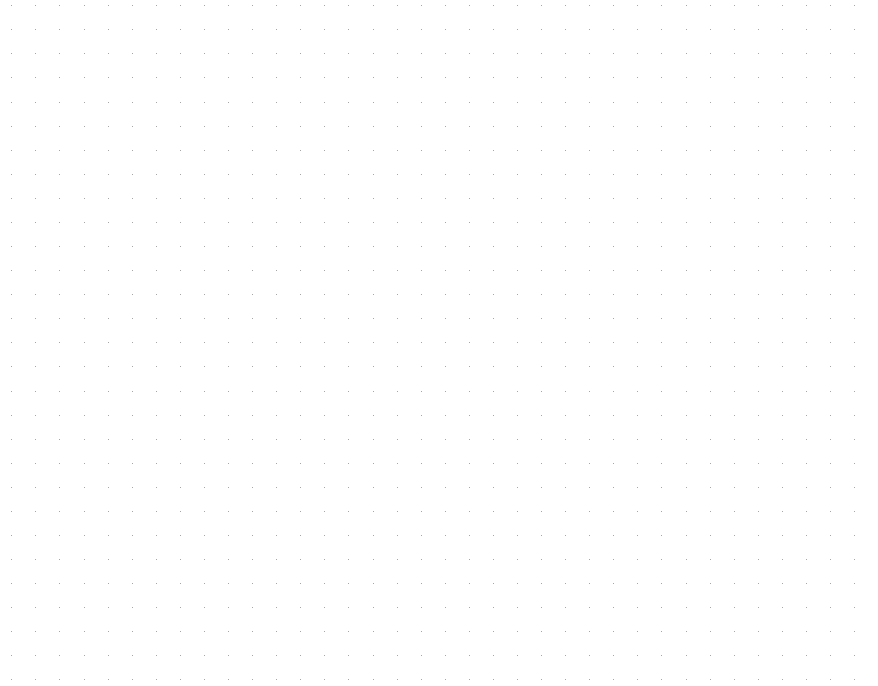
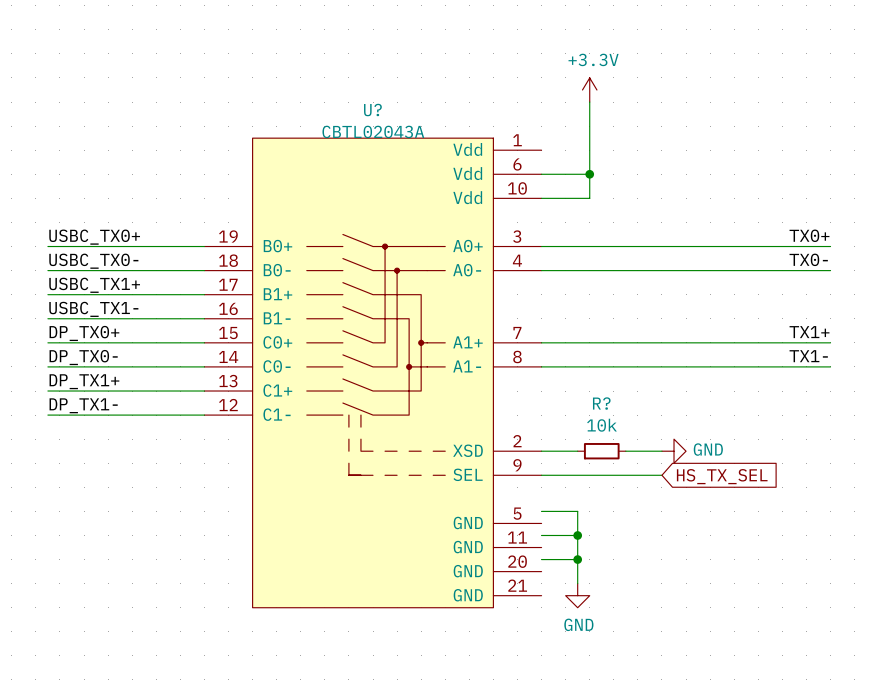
power symbol: none -> +3.3V (589, 90)
wire: none -> (589, 102) (589, 198) (541, 198)
wire: none -> (541, 174) (589, 174)
junction: none -> (589, 174)
label: none -> TX0+ (809, 235)
label: none -> USBC_TX0+ (94, 237)
wire: none -> (47, 246) (204, 246)
wire: none -> (541, 246) (830, 246)
label: none -> TX0- (808, 259)
label: none -> USBC_TX0- (93, 261)
wire: none -> (47, 270) (204, 270)
wire: none -> (541, 270) (830, 270)
label: none -> USBC_TX1+ (94, 285)
wire: none -> (47, 294) (204, 294)
label: none -> USBC_TX1- (93, 309)
wire: none -> (47, 318) (204, 318)
label: none -> TX1+ (809, 332)
label: none -> DP_TX0+ (84, 333)
wire: none -> (47, 342) (204, 342)
wire: none -> (541, 342) (830, 342)
label: none -> TX1- (808, 356)
label: none -> DP_TX0- (83, 357)
wire: none -> (47, 366) (204, 366)
wire: none -> (541, 366) (830, 366)
U?: none -> CBTL02043A (373, 372)
label: none -> DP_TX1+ (84, 381)
wire: none -> (47, 391) (204, 391)
label: none -> DP_TX1- (83, 405)
wire: none -> (47, 415) (204, 415)
wire: none -> (541, 451) (577, 451)
R?: none -> 10k (601, 451)
wire: none -> (625, 451) (661, 451)
power symbol: none -> GND (674, 451)
wire: none -> (541, 475) (661, 475)
global label: none -> HS_TX_SEL (722, 476)
wire: none -> (541, 511) (577, 511) (577, 583)
wire: none -> (541, 535) (577, 535)
junction: none -> (577, 535)
wire: none -> (541, 559) (577, 559)
junction: none -> (577, 559)
power symbol: none -> GND (577, 595)

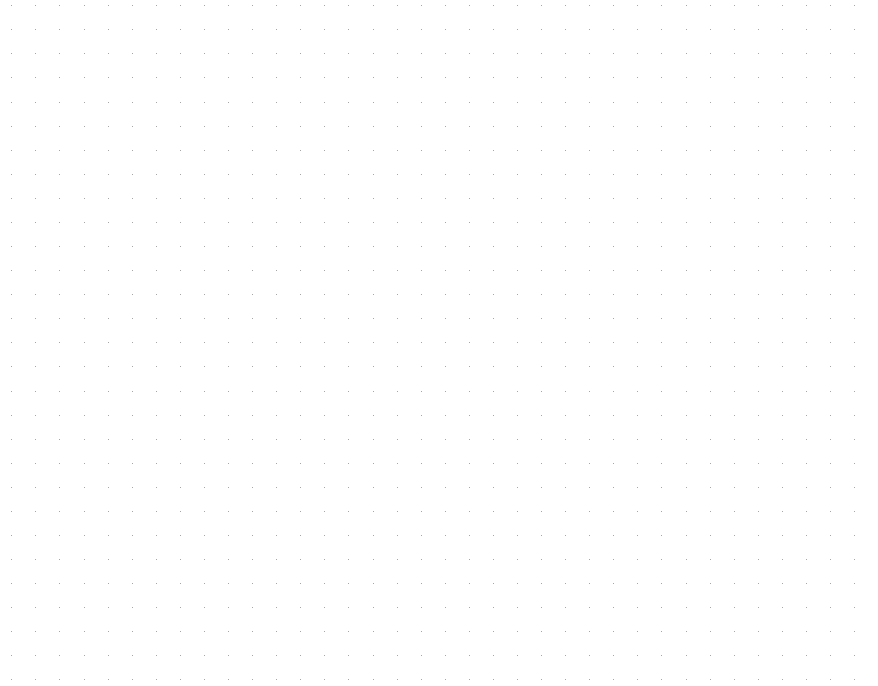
power symbol: +3.3V (589, 90) -> none
wire: (589, 102) (589, 198) (541, 198) -> none
wire: (541, 174) (589, 174) -> none
junction: (589, 174) -> none
label: TX0+ (809, 235) -> none
label: USBC_TX0+ (94, 237) -> none
wire: (47, 246) (204, 246) -> none
wire: (541, 246) (830, 246) -> none
label: TX0- (808, 259) -> none
label: USBC_TX0- (93, 261) -> none
wire: (47, 270) (204, 270) -> none
wire: (541, 270) (830, 270) -> none
label: USBC_TX1+ (94, 285) -> none
wire: (47, 294) (204, 294) -> none
label: USBC_TX1- (93, 309) -> none
wire: (47, 318) (204, 318) -> none
label: TX1+ (809, 332) -> none
label: DP_TX0+ (84, 333) -> none
wire: (47, 342) (204, 342) -> none
wire: (541, 342) (830, 342) -> none
label: TX1- (808, 356) -> none
label: DP_TX0- (83, 357) -> none
wire: (47, 366) (204, 366) -> none
wire: (541, 366) (830, 366) -> none
U?: CBTL02043A (373, 372) -> none
label: DP_TX1+ (84, 381) -> none
wire: (47, 391) (204, 391) -> none
label: DP_TX1- (83, 405) -> none
wire: (47, 415) (204, 415) -> none
wire: (541, 451) (577, 451) -> none
R?: 10k (601, 451) -> none
wire: (625, 451) (661, 451) -> none
power symbol: GND (674, 451) -> none
wire: (541, 475) (661, 475) -> none
global label: HS_TX_SEL (722, 476) -> none
wire: (541, 511) (577, 511) (577, 583) -> none
wire: (541, 535) (577, 535) -> none
junction: (577, 535) -> none
wire: (541, 559) (577, 559) -> none
junction: (577, 559) -> none
power symbol: GND (577, 595) -> none

